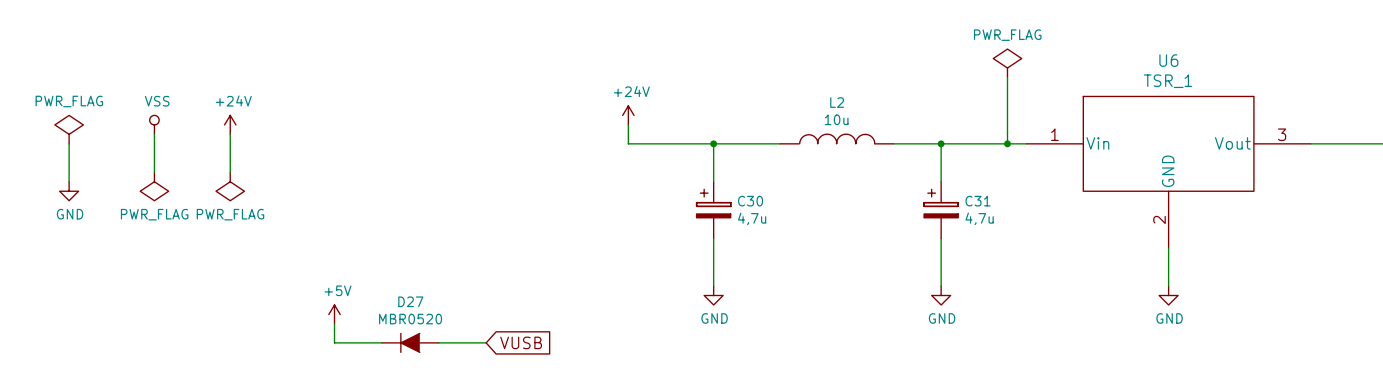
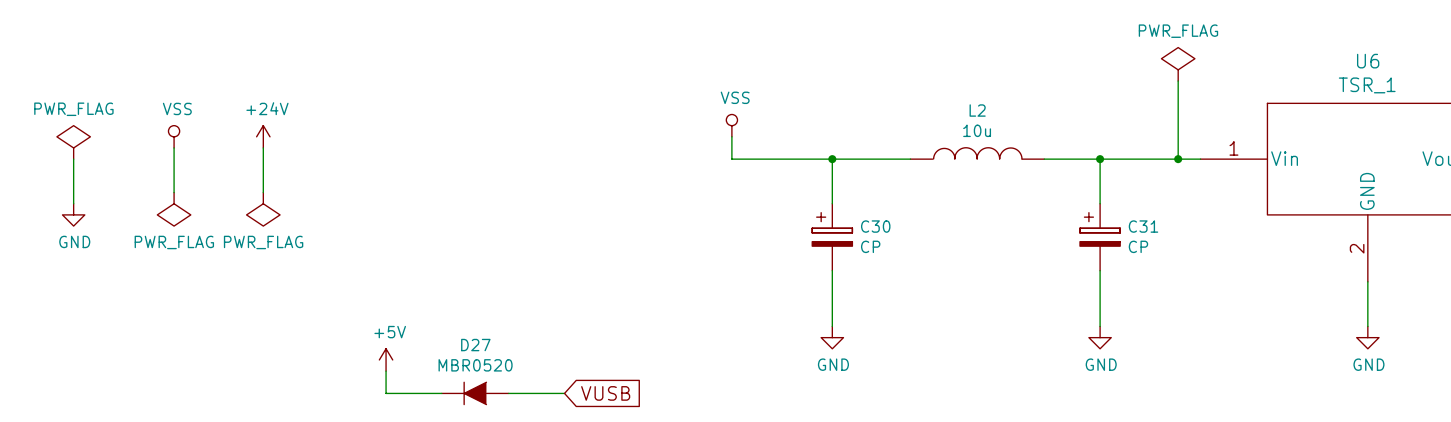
power symbol: +24V (628, 115) -> VSS (731, 125)
C30 value: 4,7u (752, 218) -> CP (870, 246)
C31 value: 4,7u (979, 218) -> CP (1138, 246)

